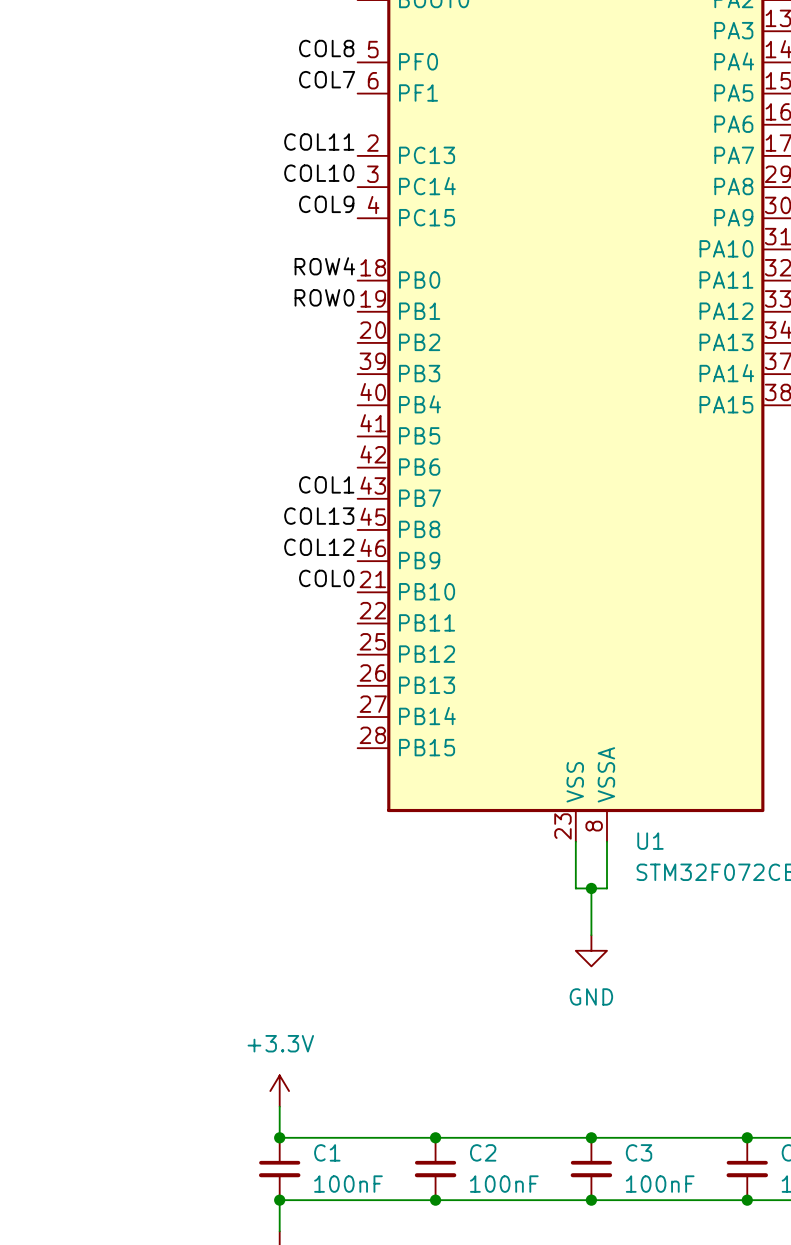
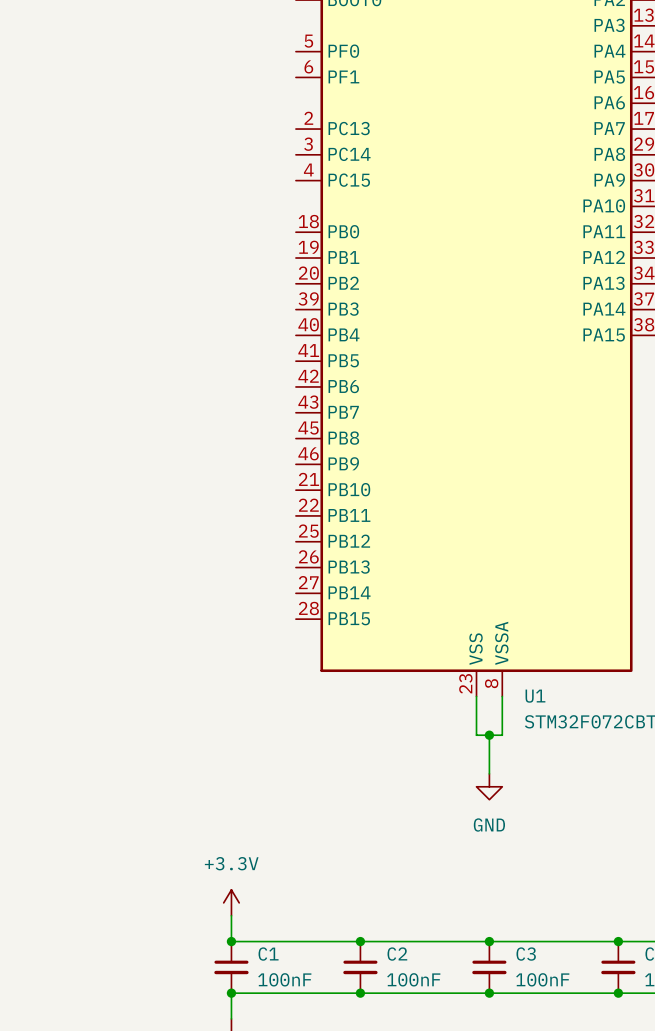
label: COL8 (326, 48) -> none
label: COL7 (327, 79) -> none
label: COL11 (319, 142) -> none
label: COL10 (319, 173) -> none
label: COL9 (326, 204) -> none
label: ROW4 (324, 266) -> none
label: ROW0 (324, 297) -> none
label: COL1 (326, 484) -> none
label: COL13 (319, 516) -> none
label: COL12 (319, 547) -> none
label: COL0 (326, 578) -> none

